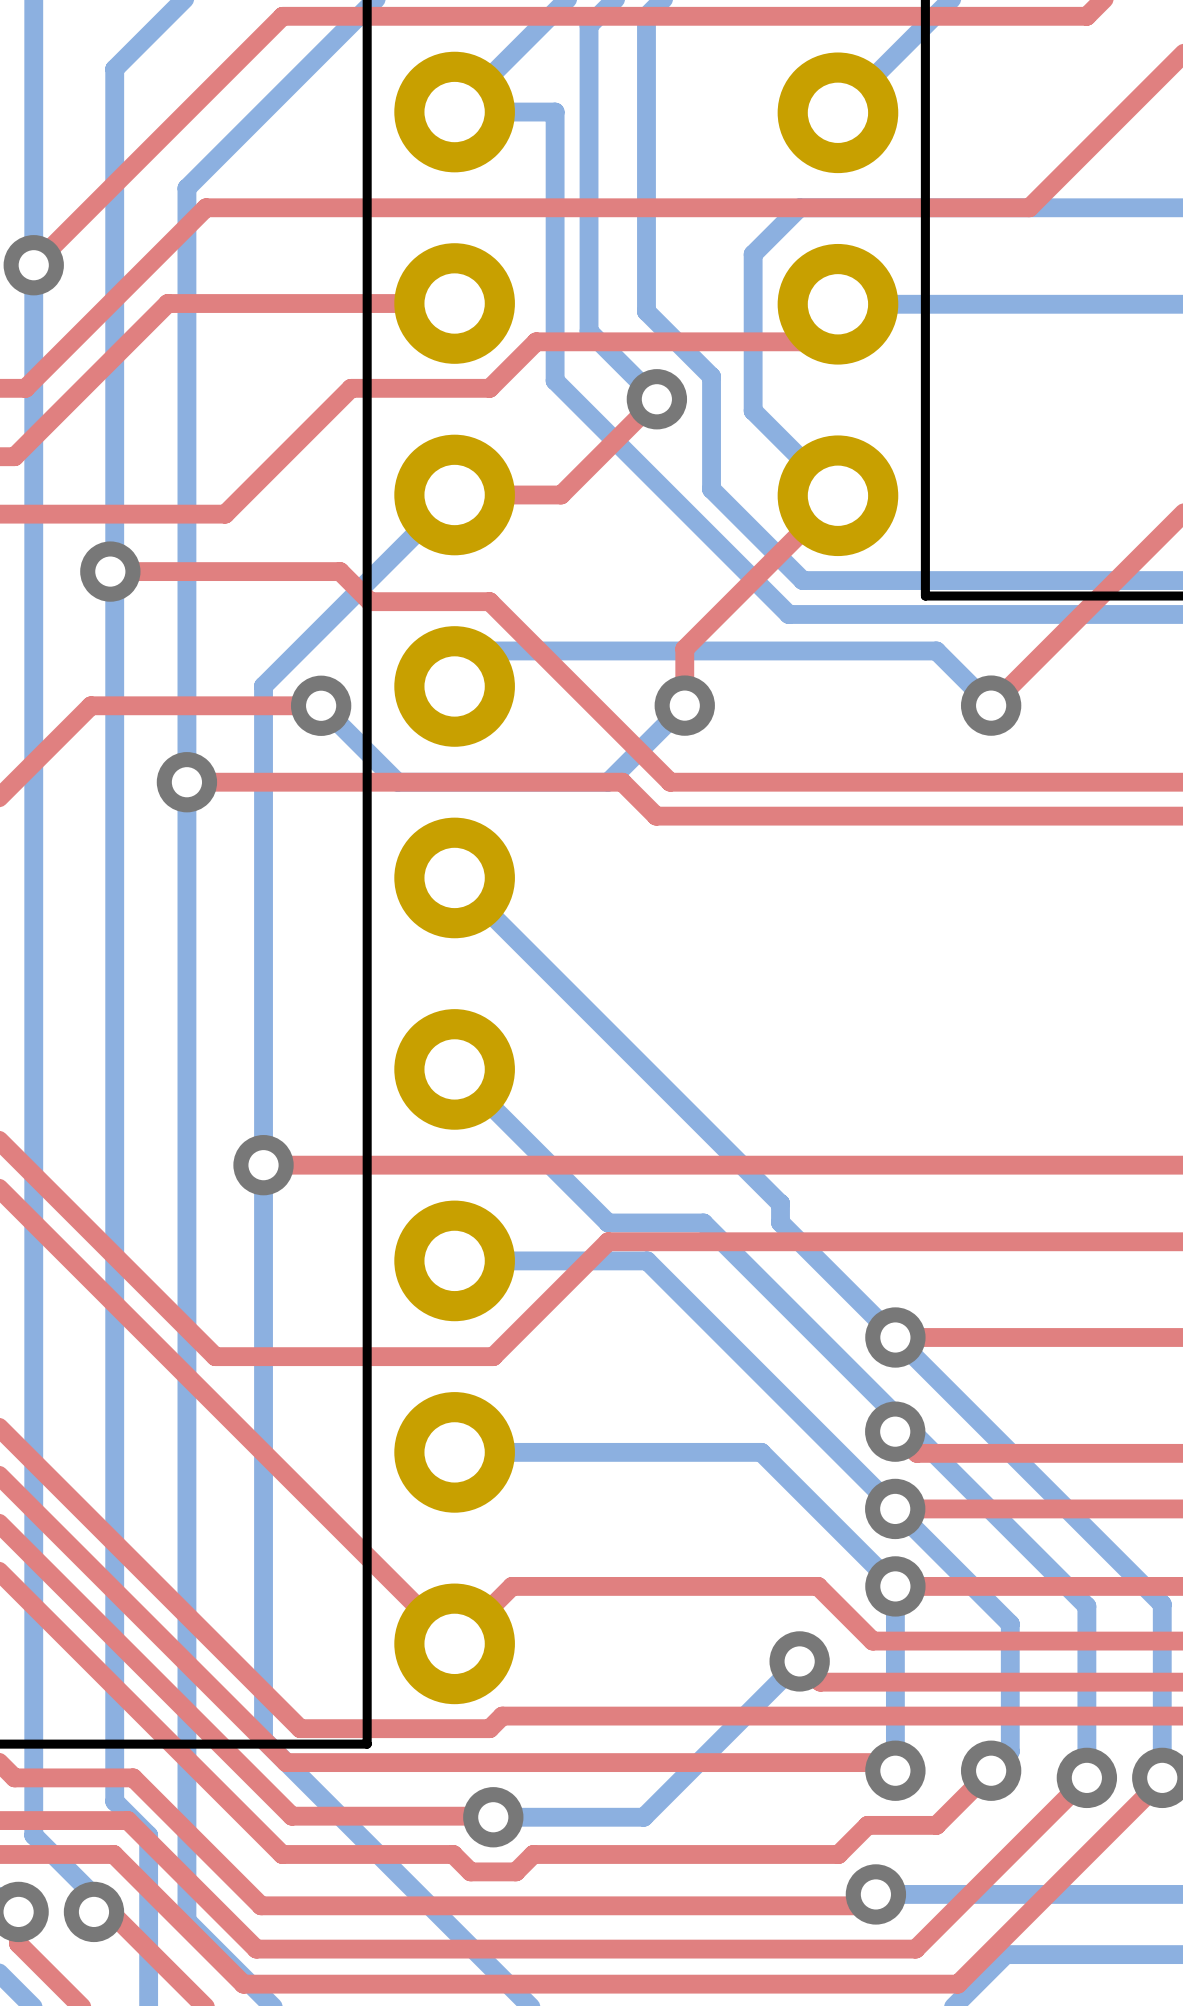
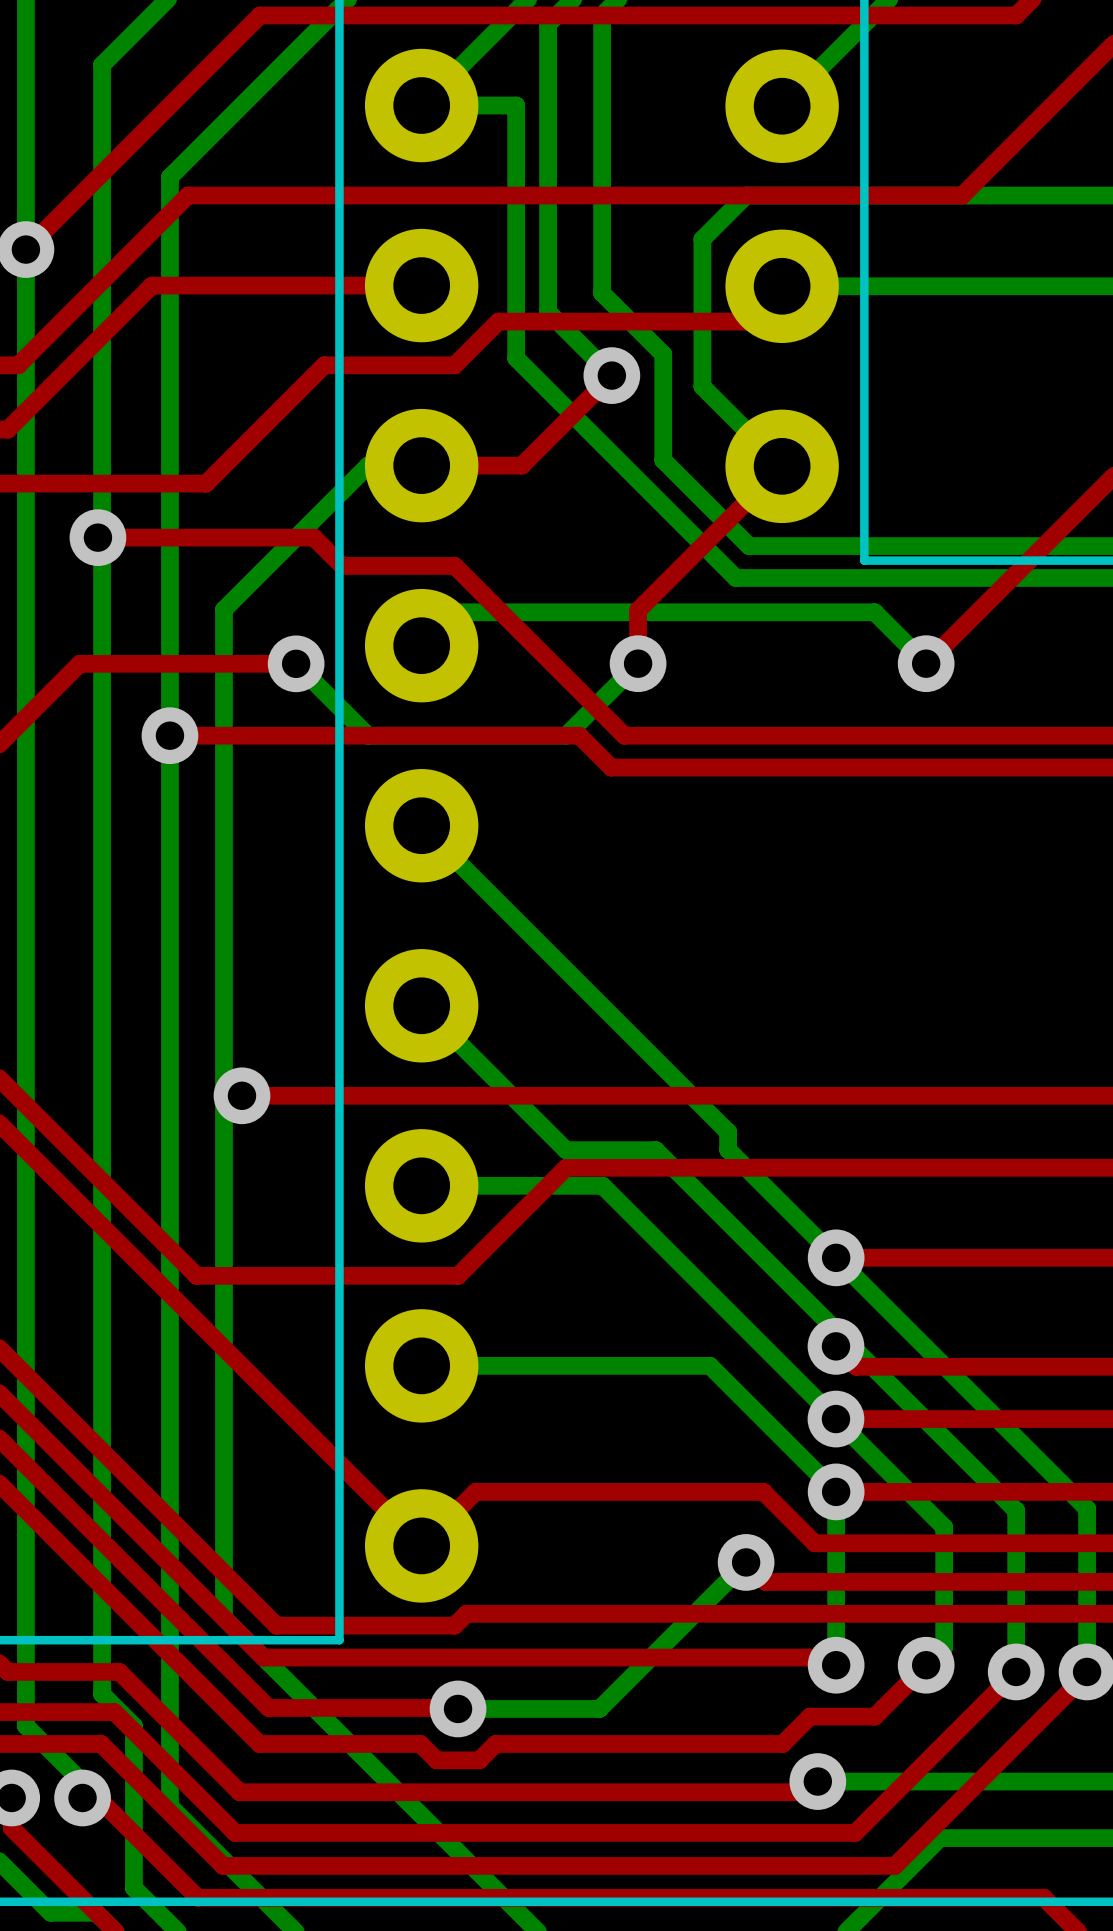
bottom track: (454, 495) (263, 686) (263, 1739) -> (421, 465) (368, 465) (223, 609) (223, 1617) (241, 1635)

